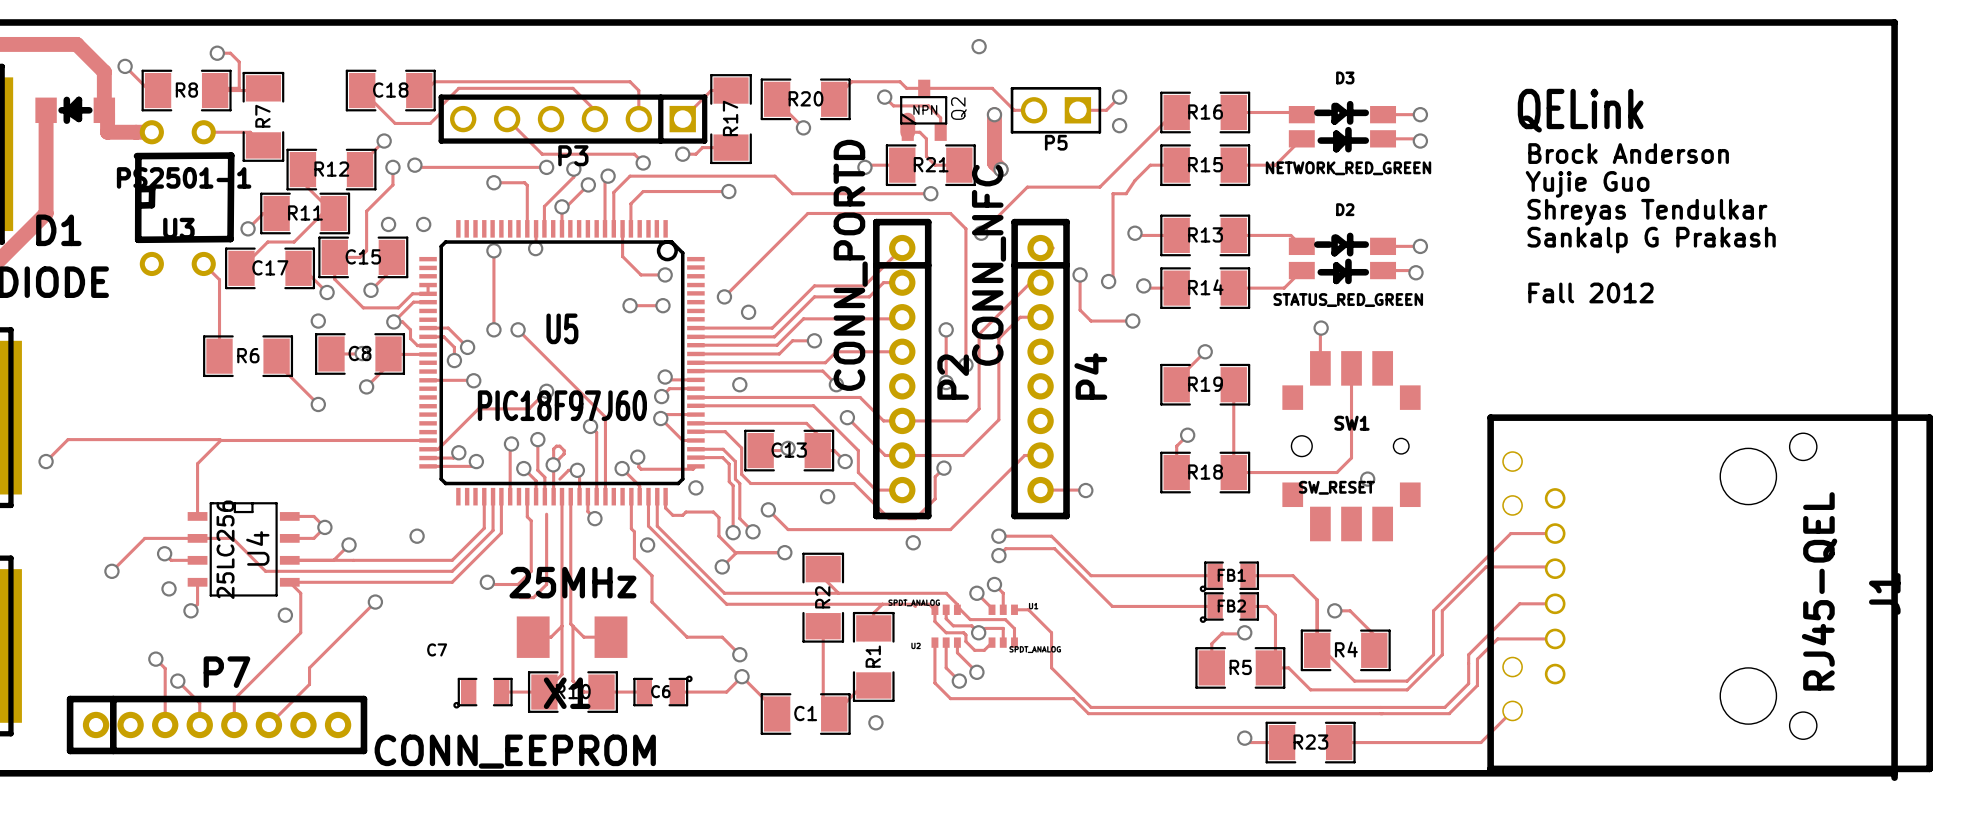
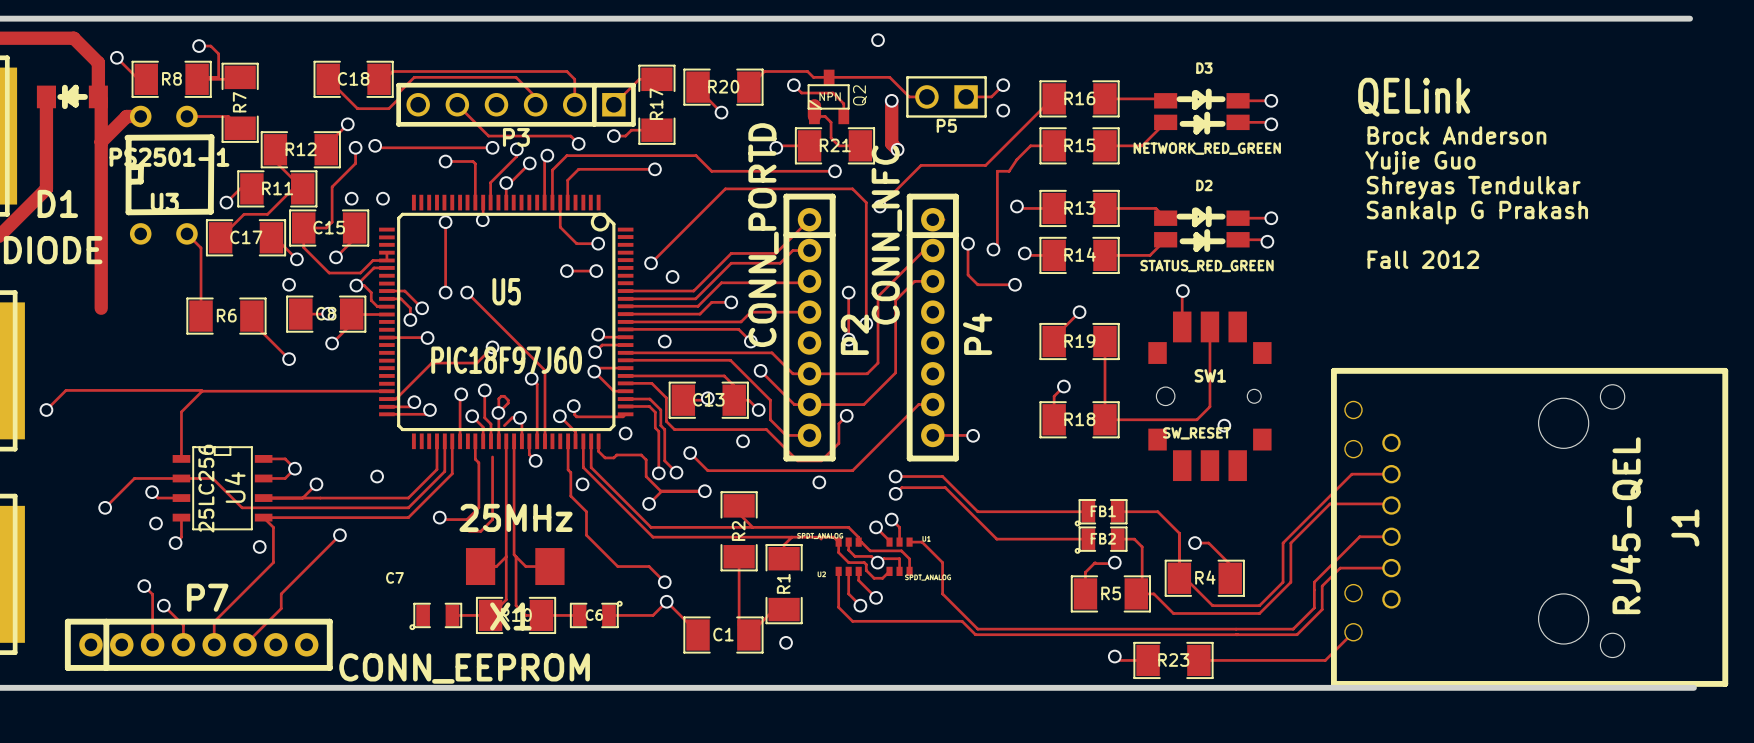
board edge: (1890, 22) (1894, 22) (1894, 777) -> none
track: (107, 132) (136, 132) -> (101, 141) (126, 116)
track: none -> (101, 116) (101, 308)

